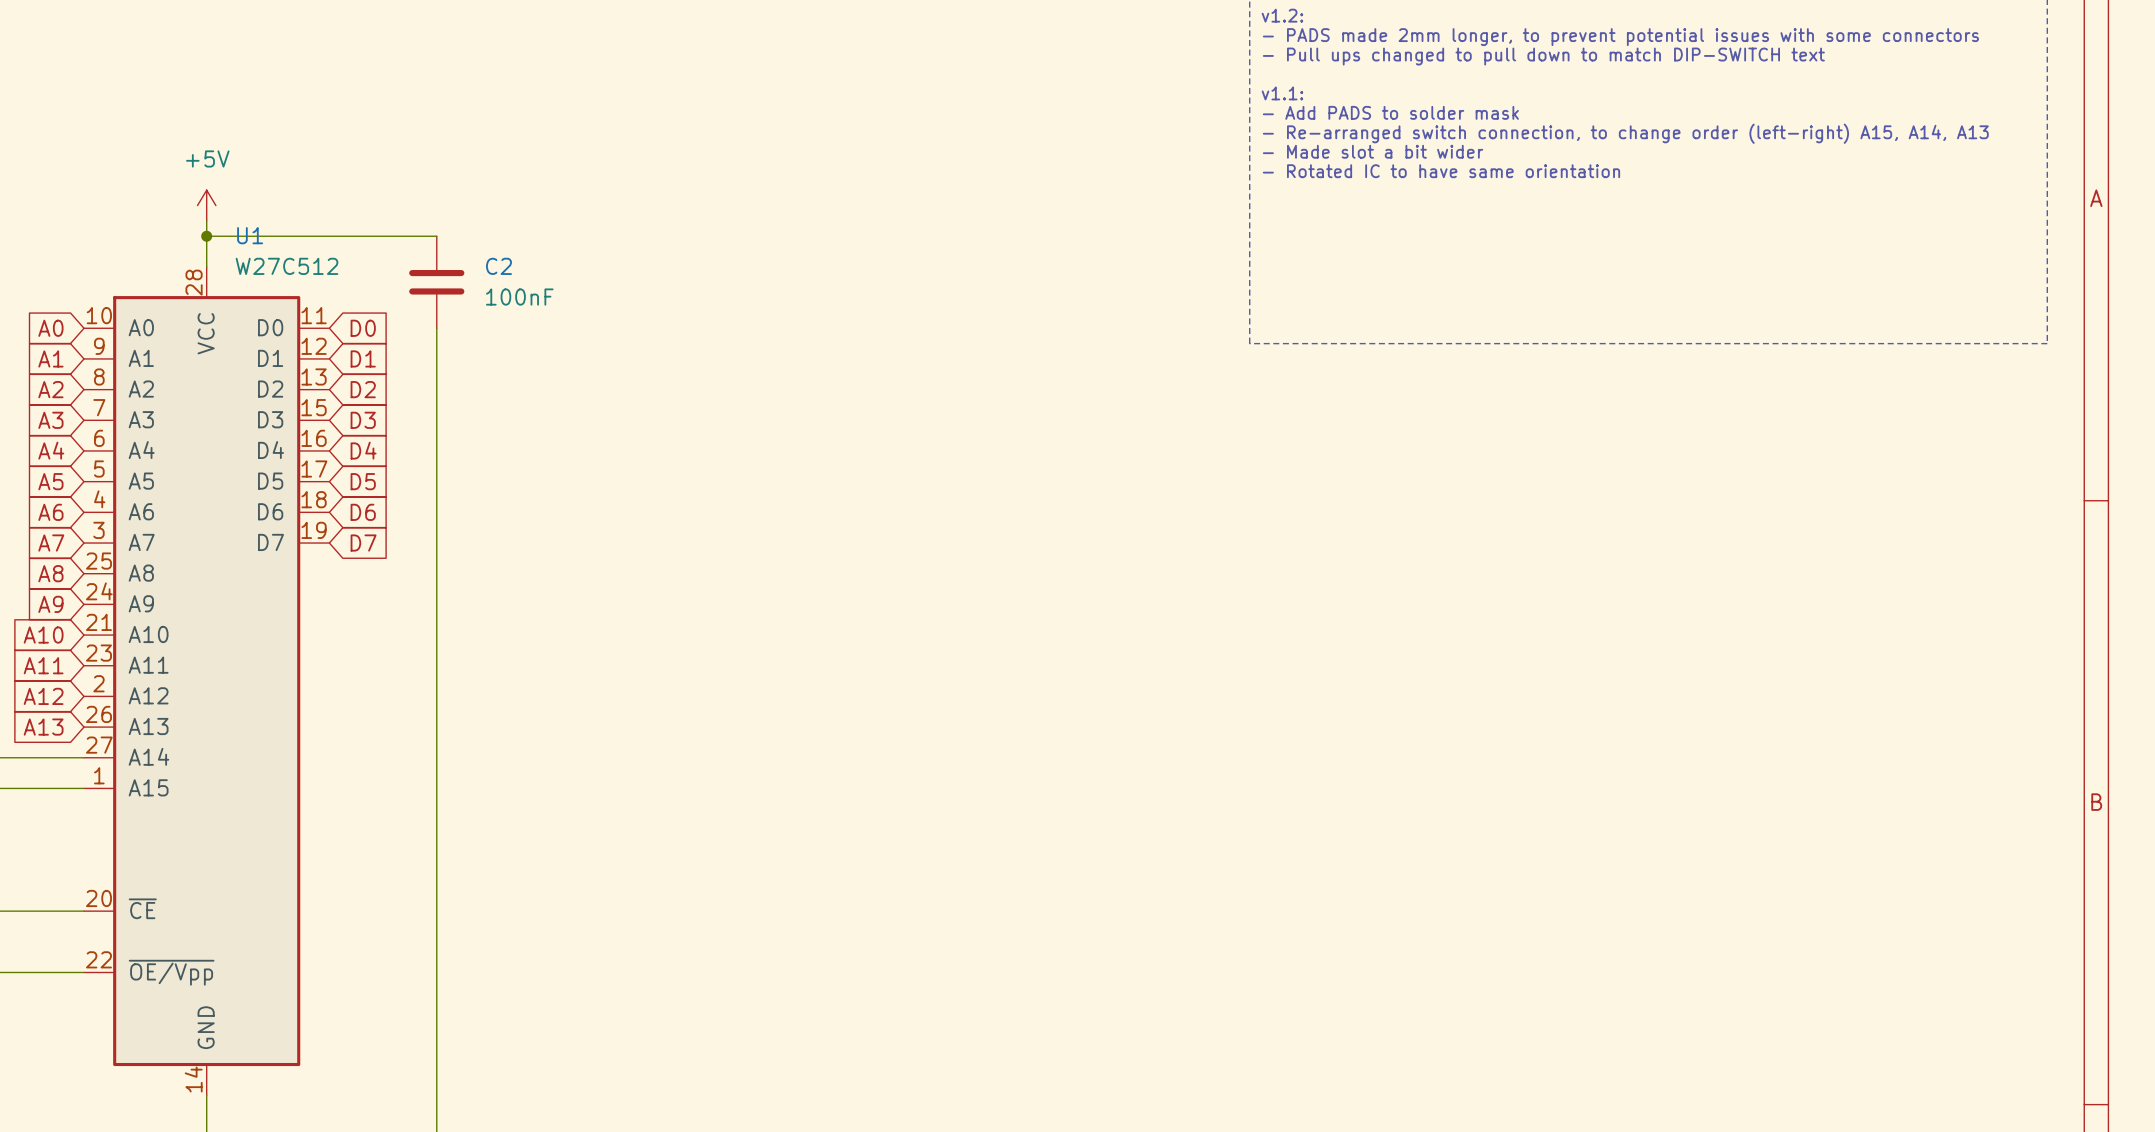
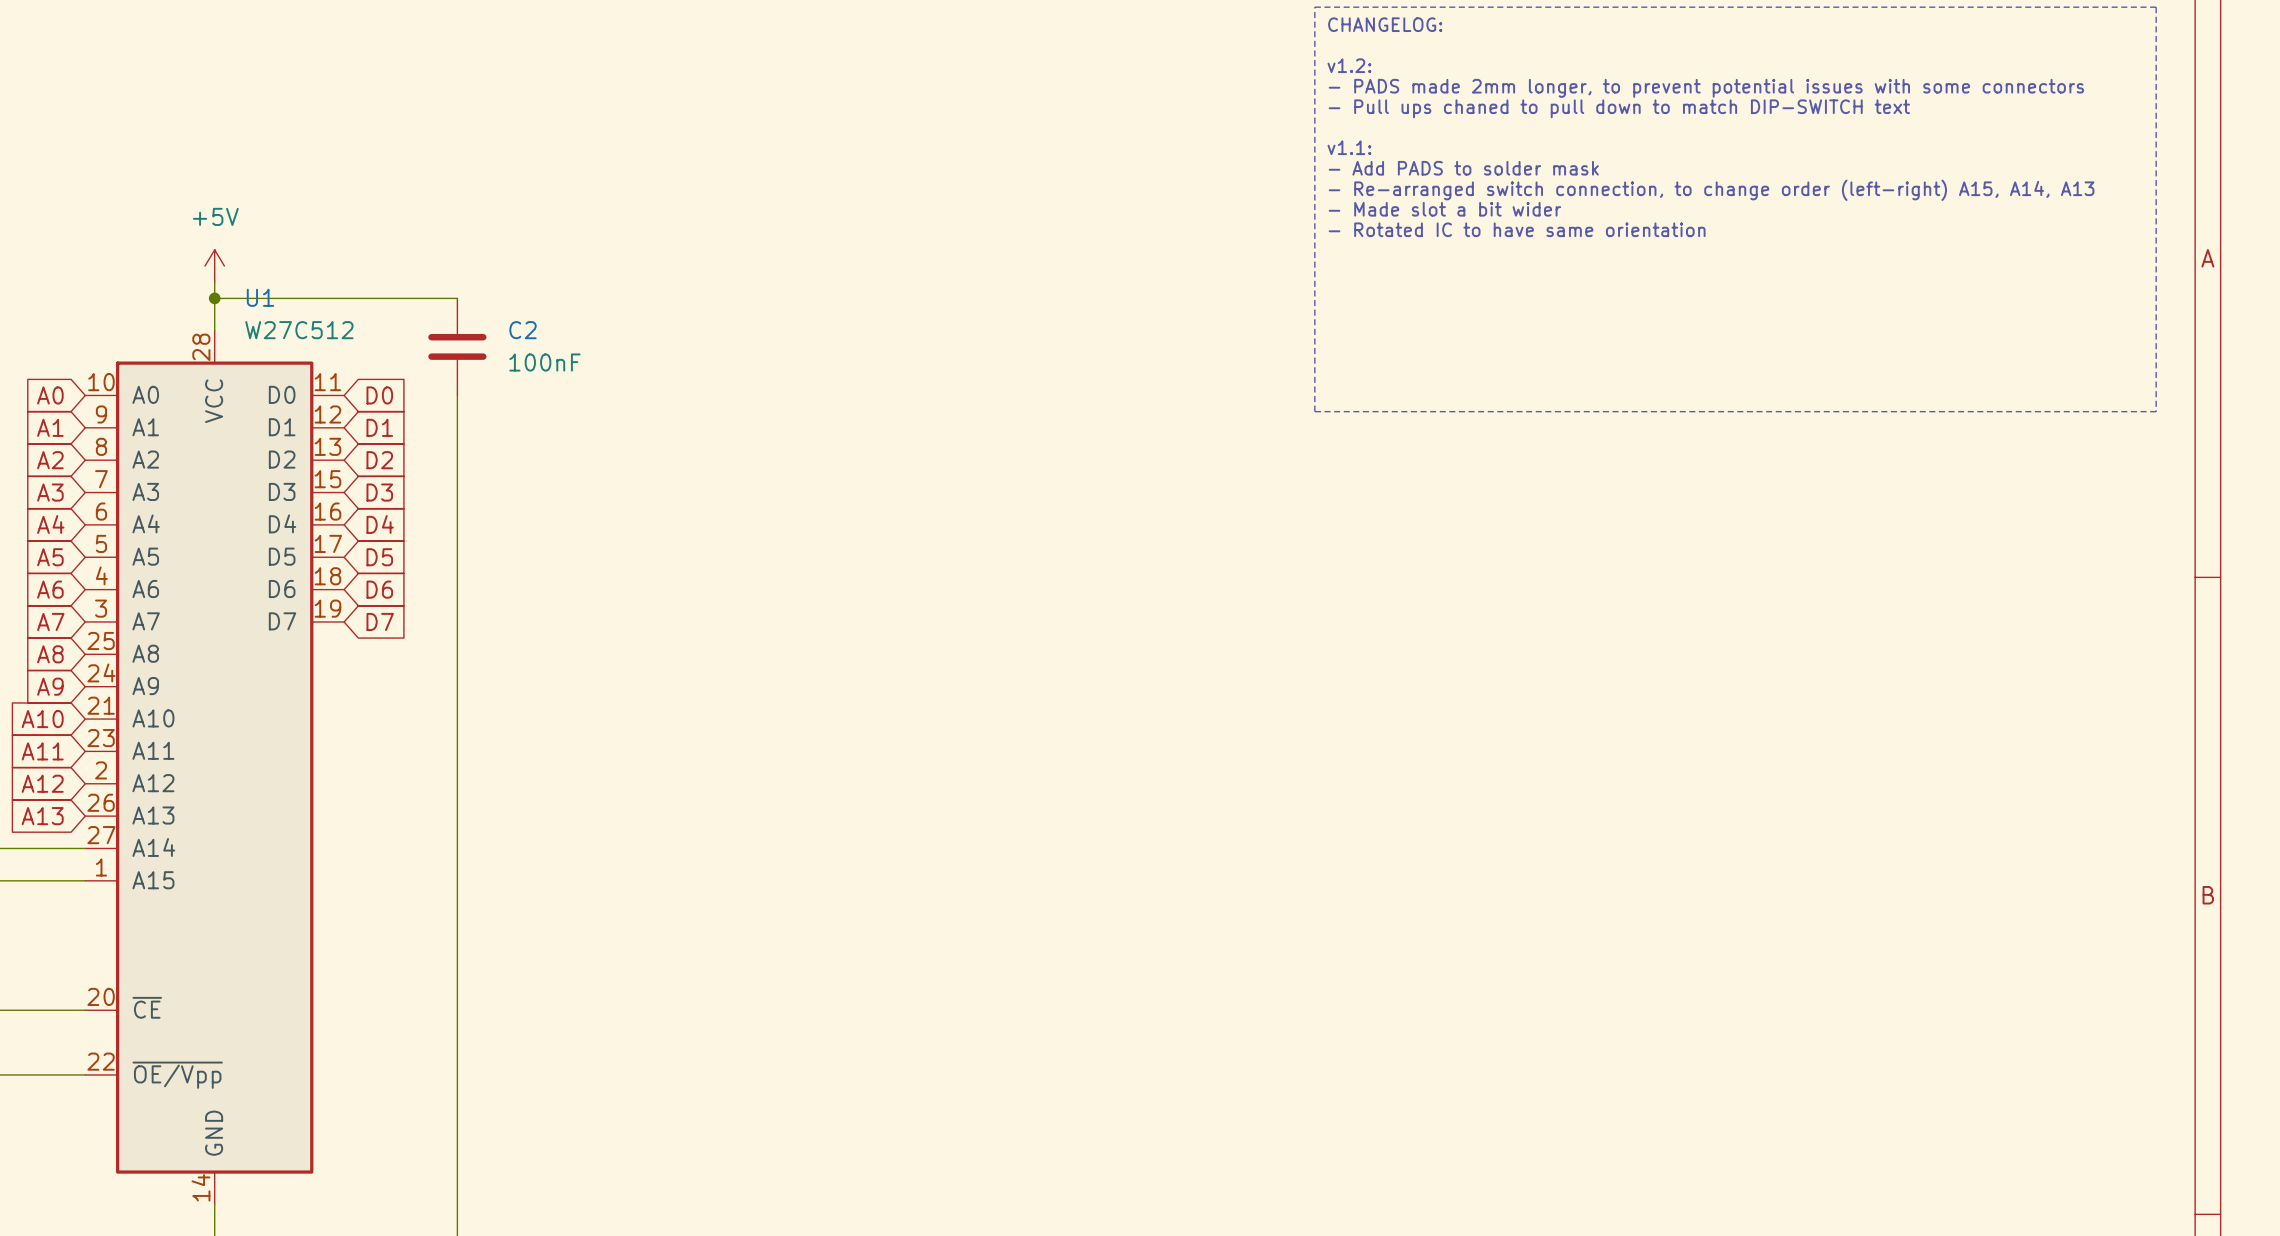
text: - Pull ups changed to pull down to match DIP-SWITCH text (1543, 56) -> - Pull ups chaned to pull down to match DIP-SWITCH text (1619, 108)

